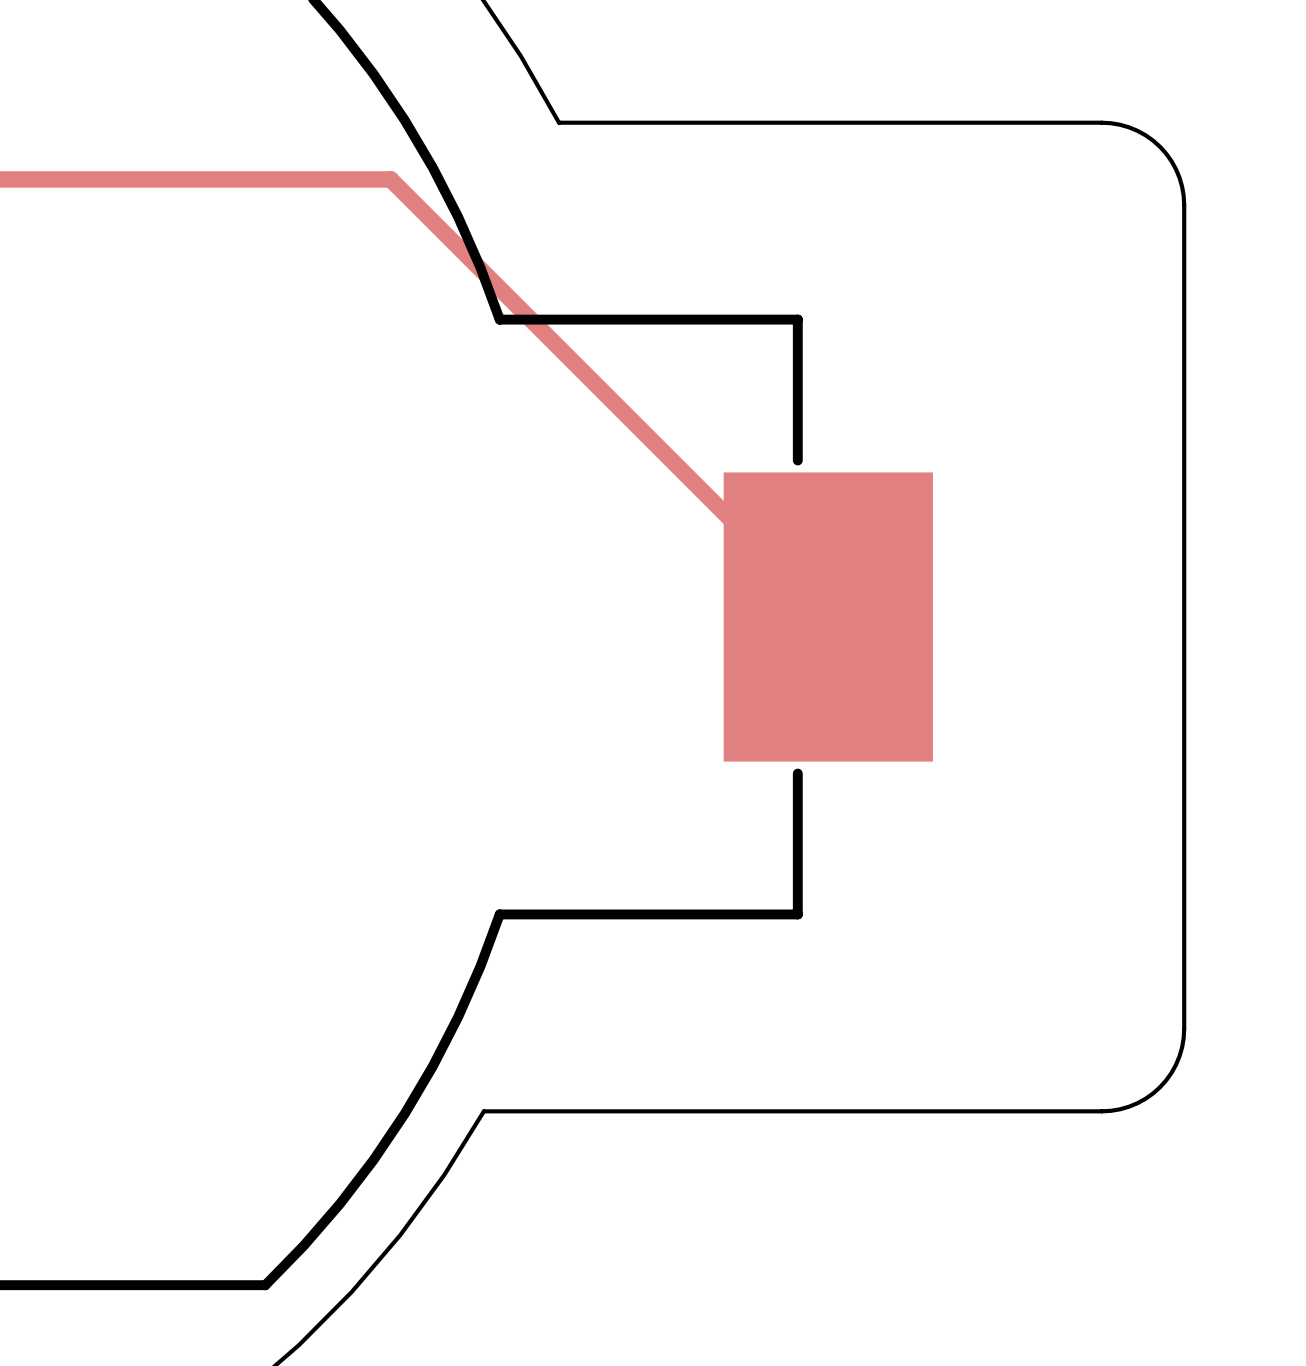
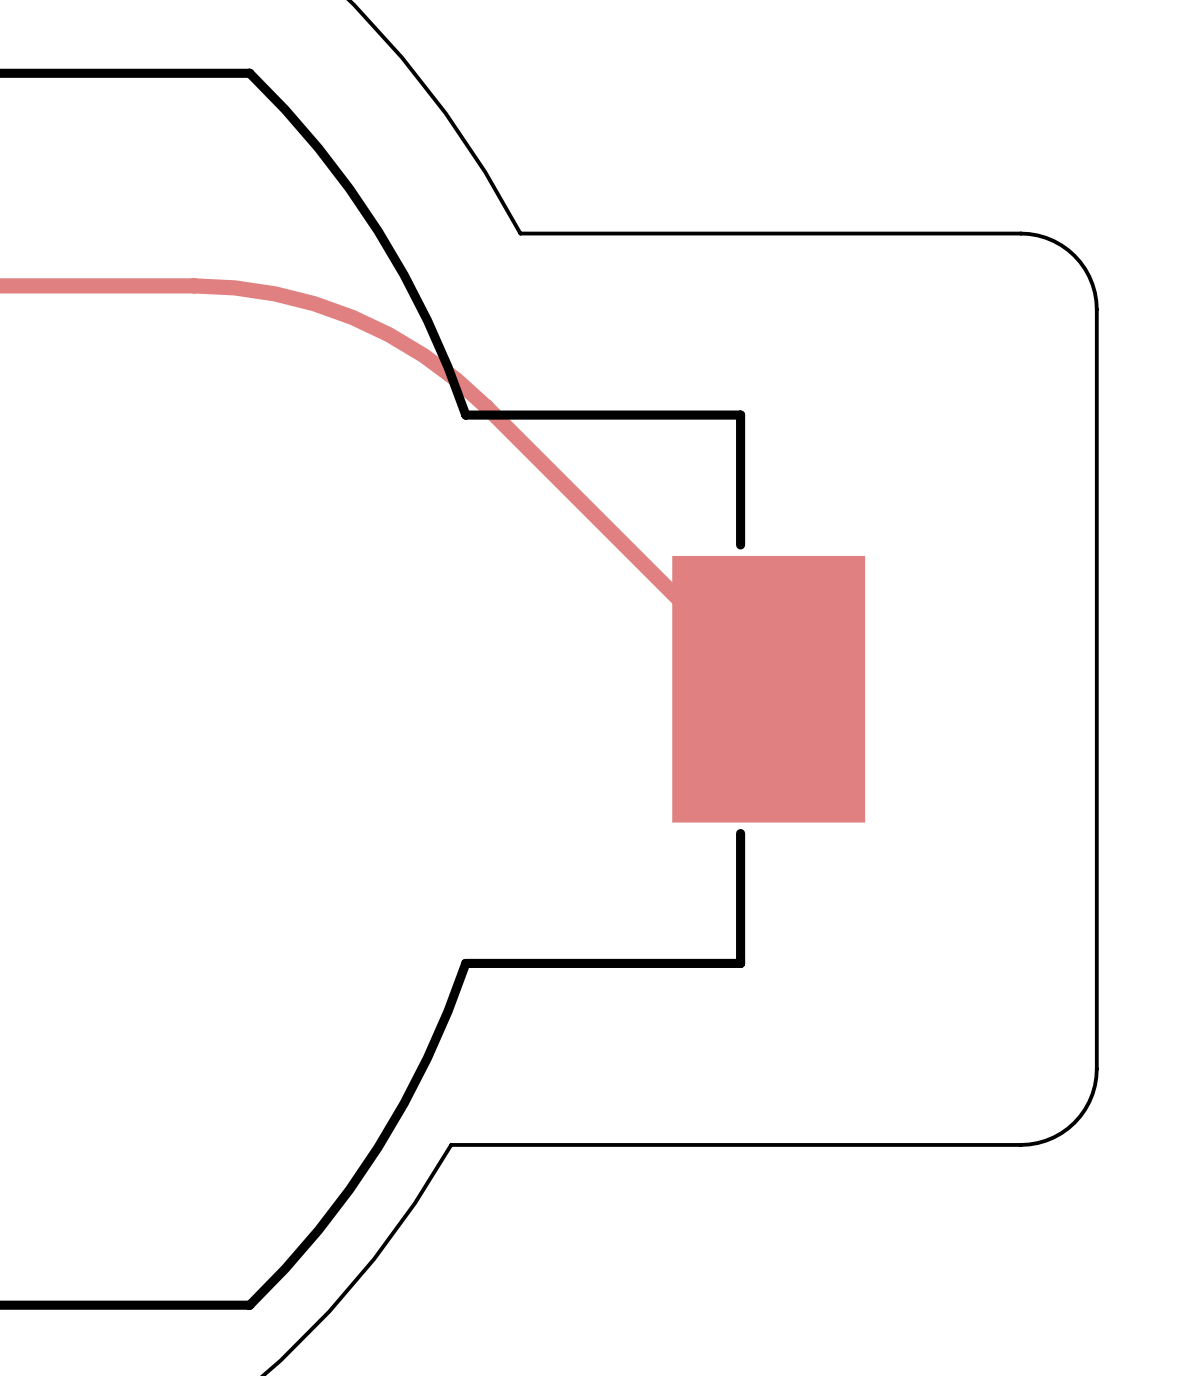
top track: (205, 179) (390, 179) (522, 310) -> (194, 285) (234, 287) (274, 293) (314, 303) (352, 317) (388, 334) (423, 355) (456, 379) (486, 406)

